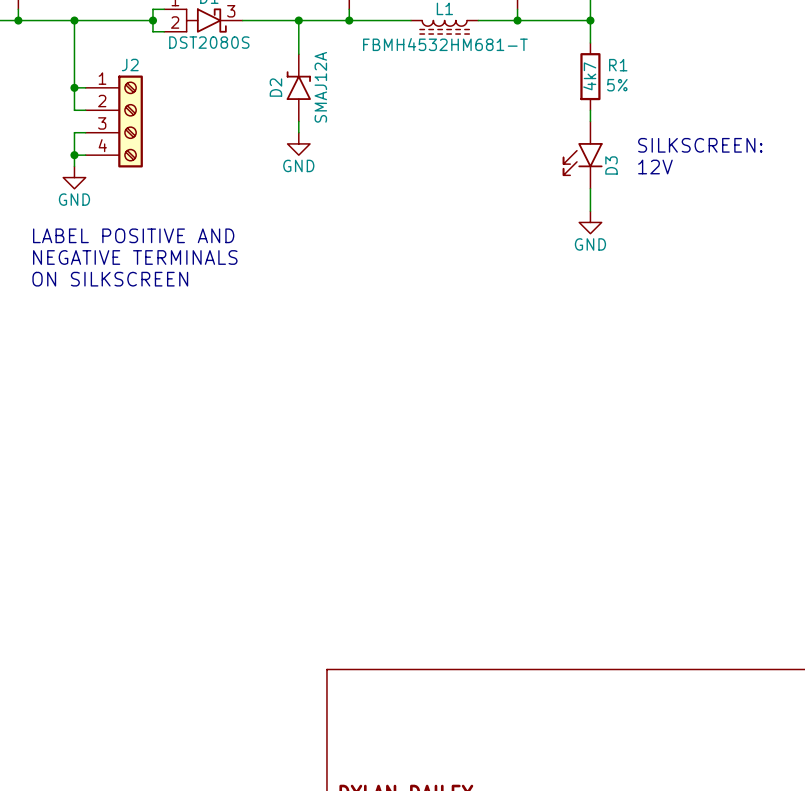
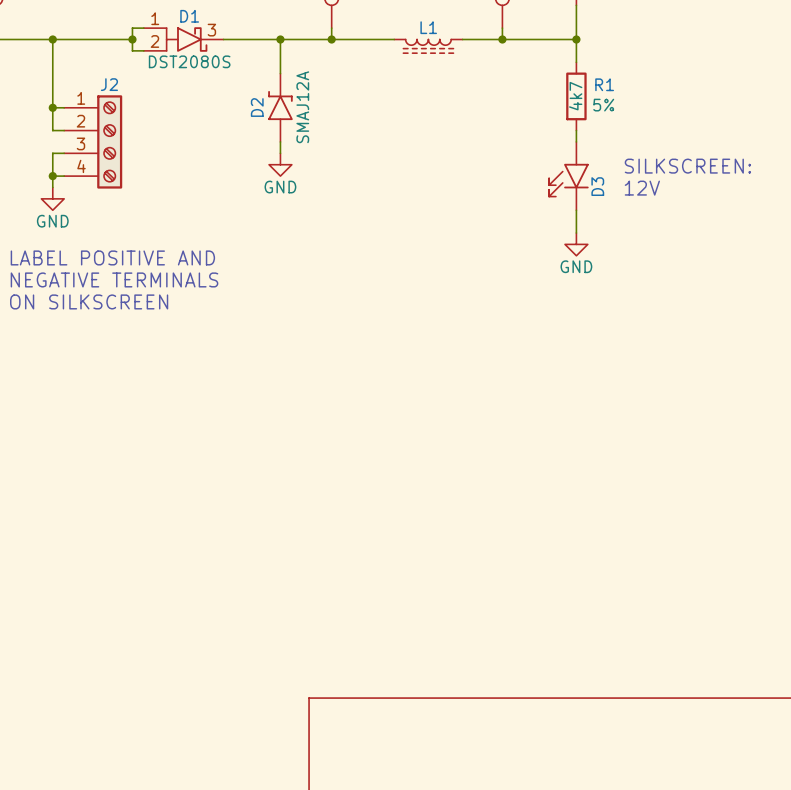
L1 value: FBMH4532HM681-T (445, 44) -> none

